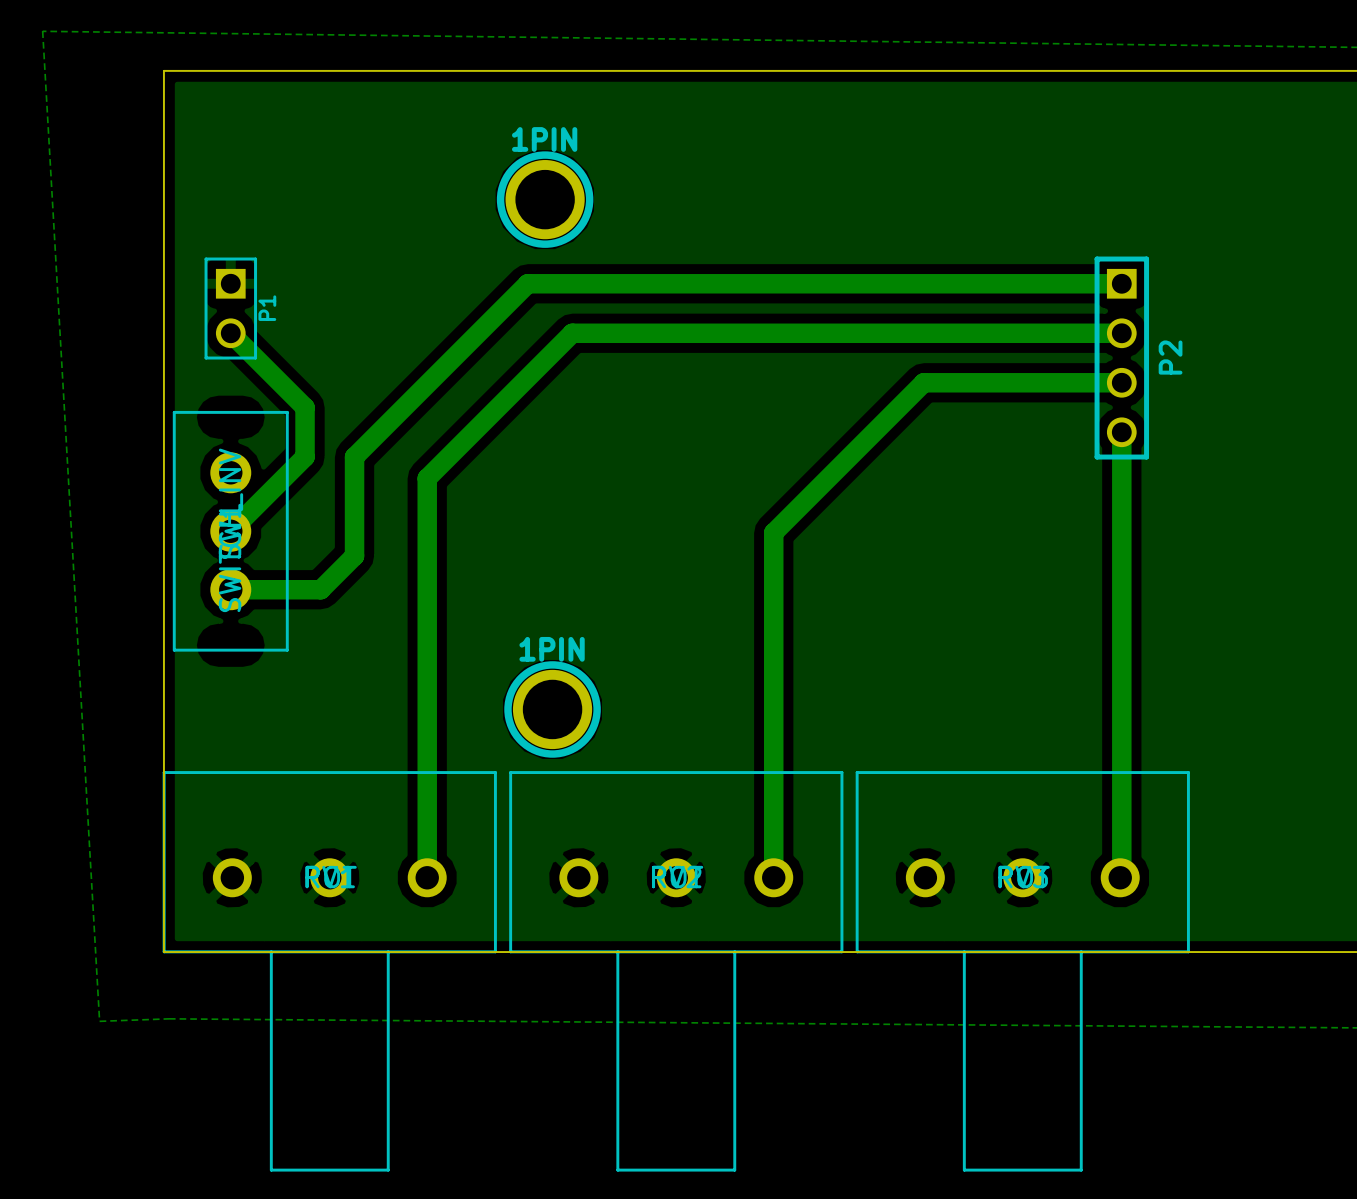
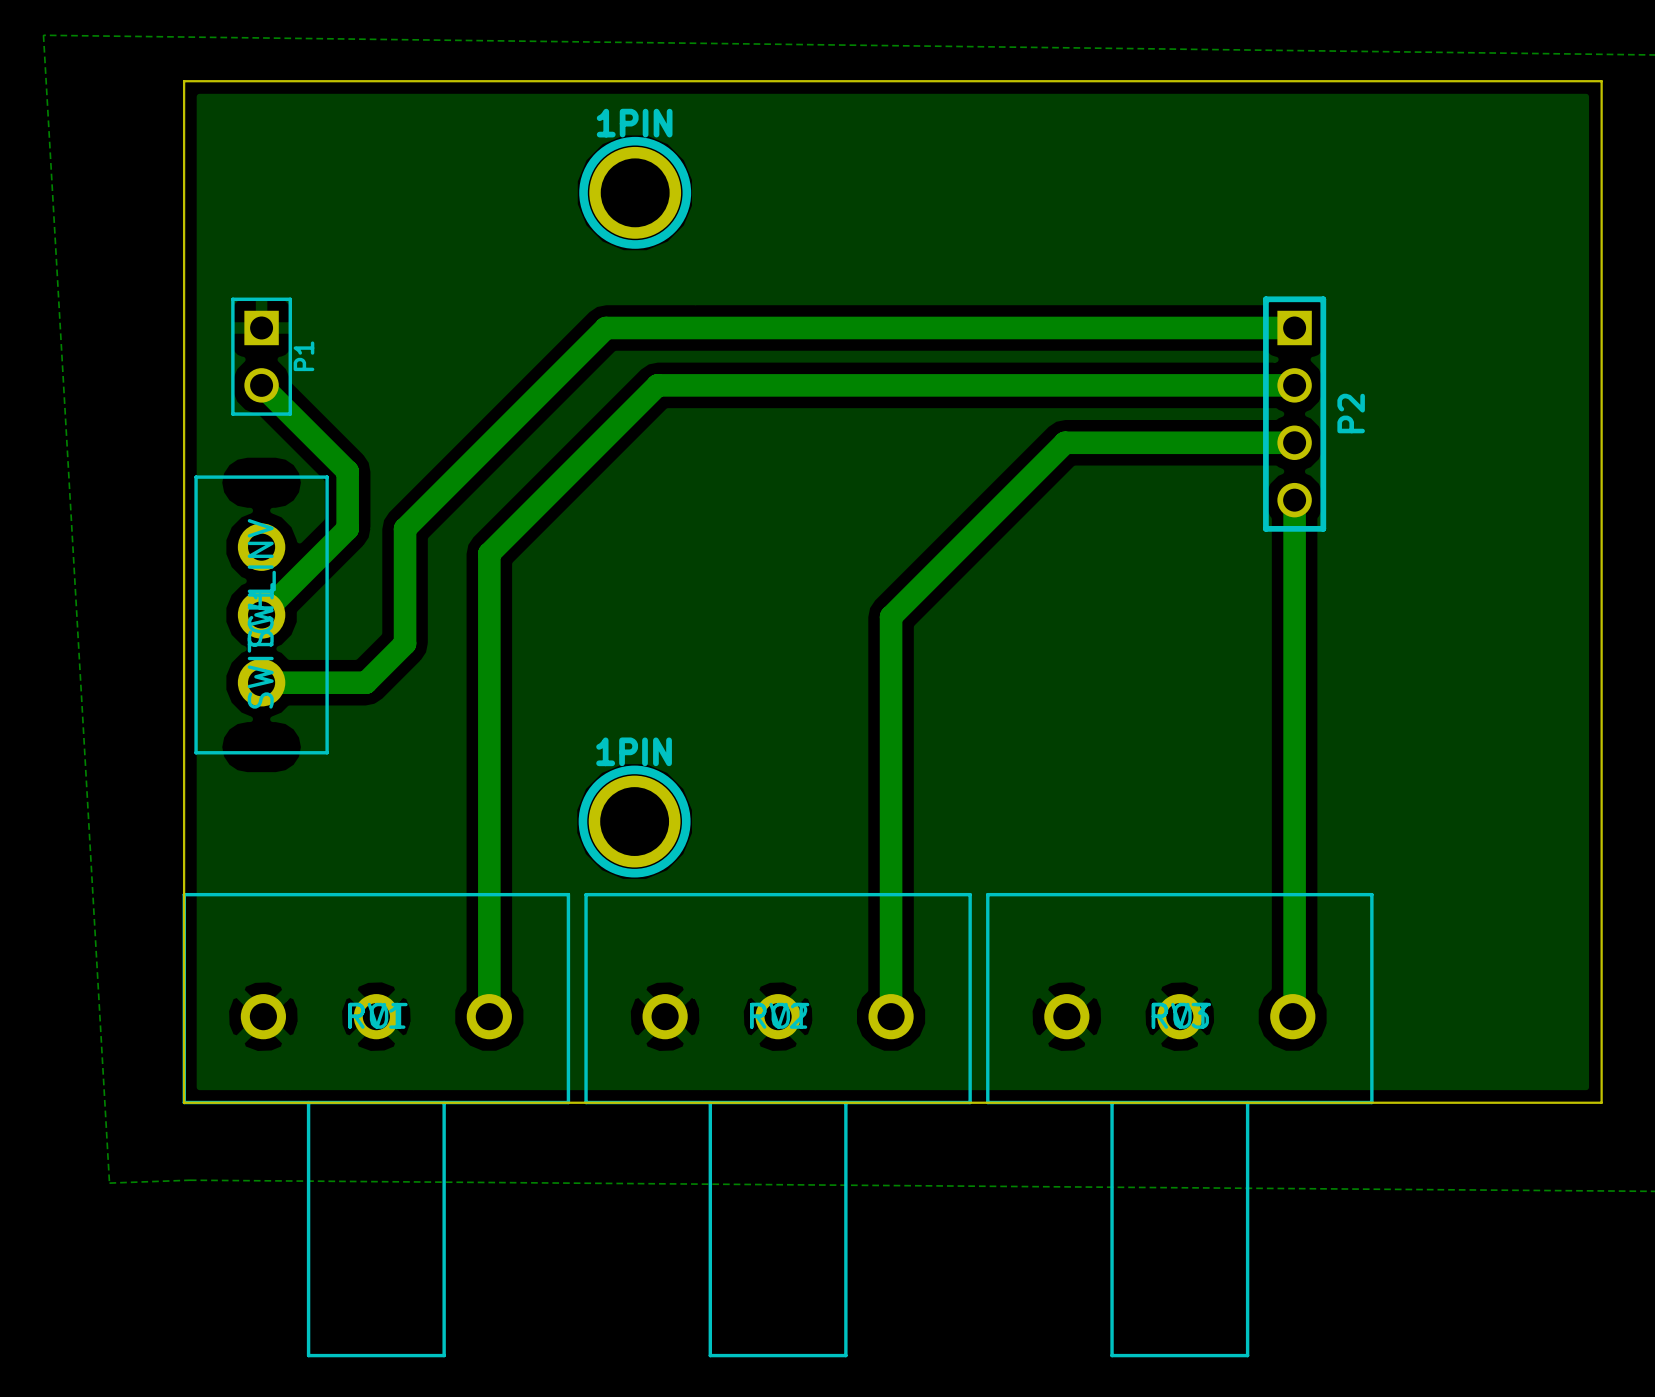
1PIN position: (545, 199) -> (635, 192)

